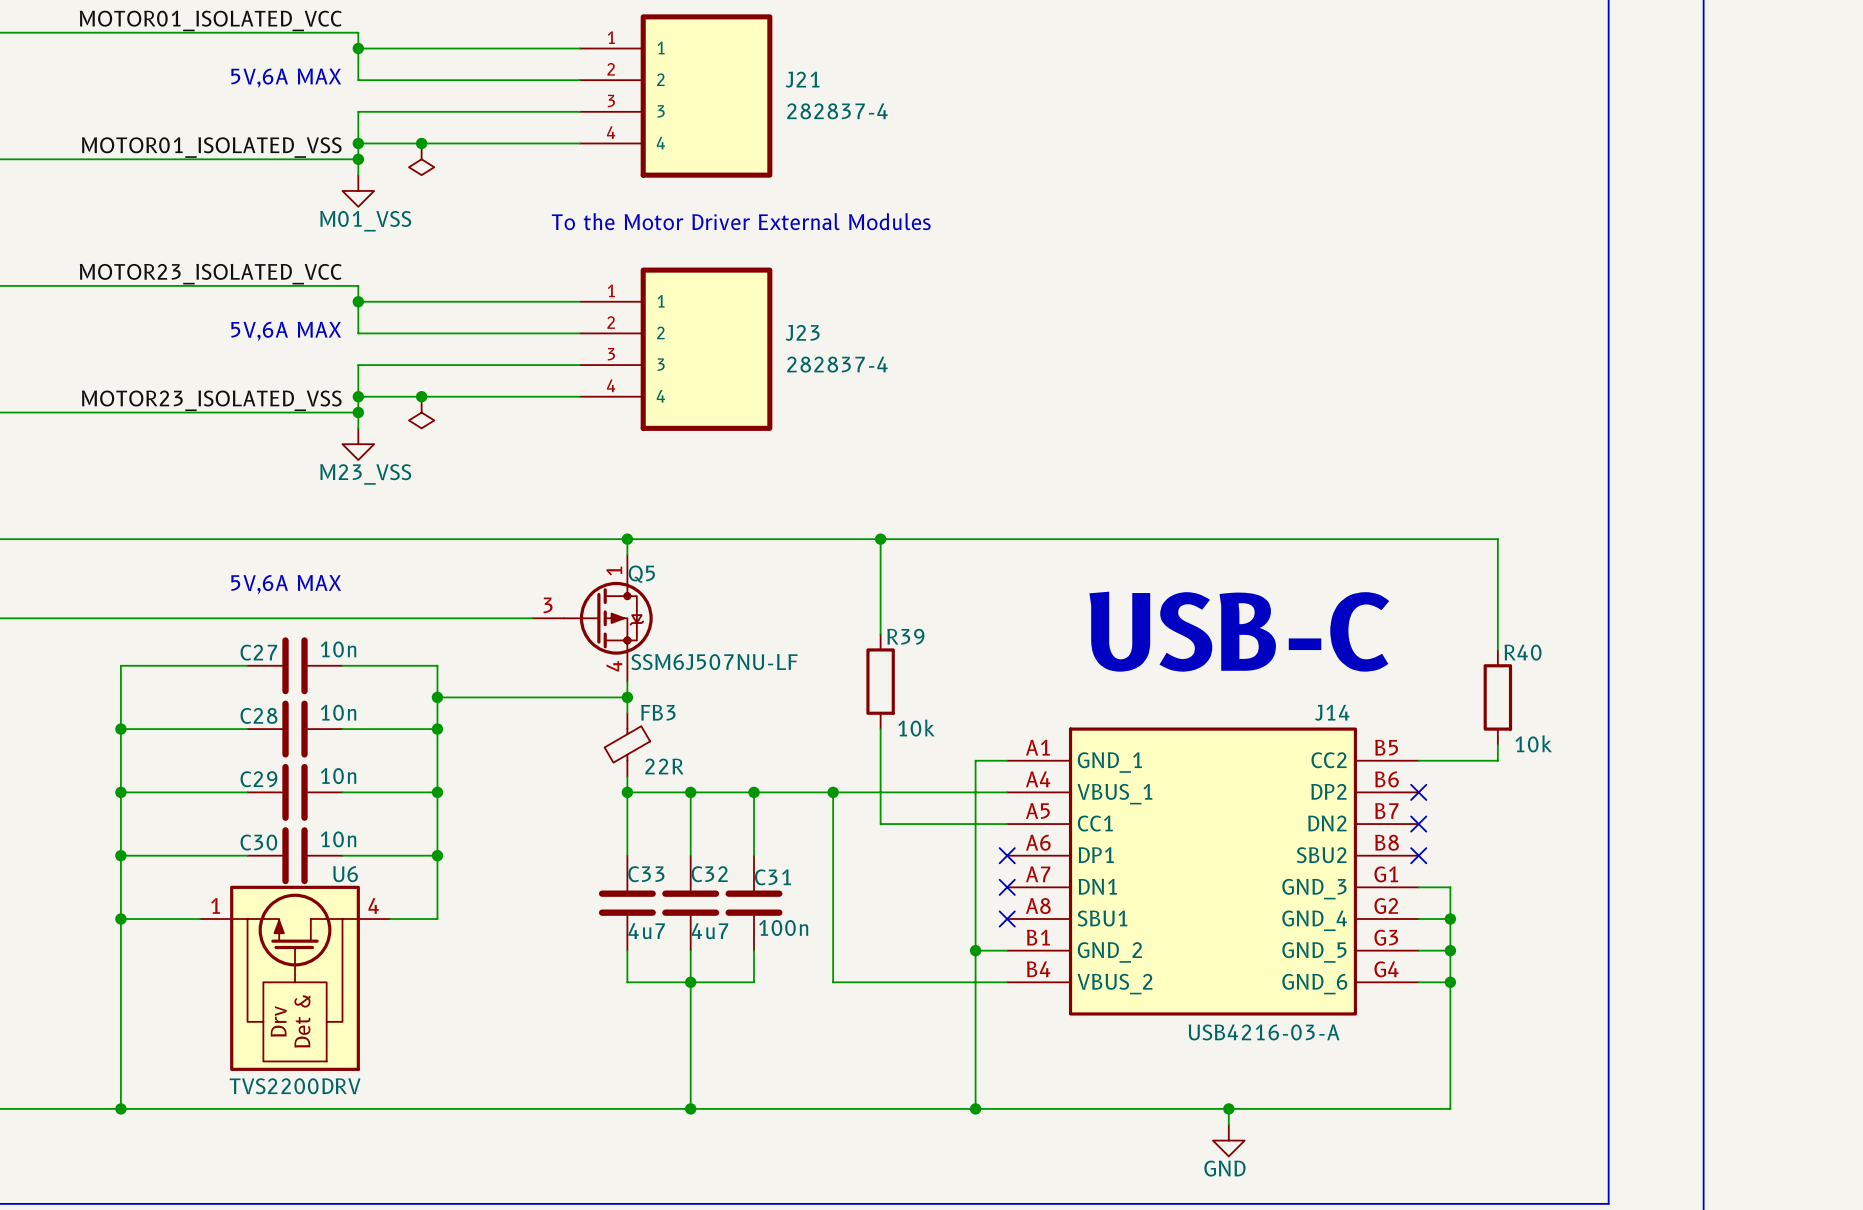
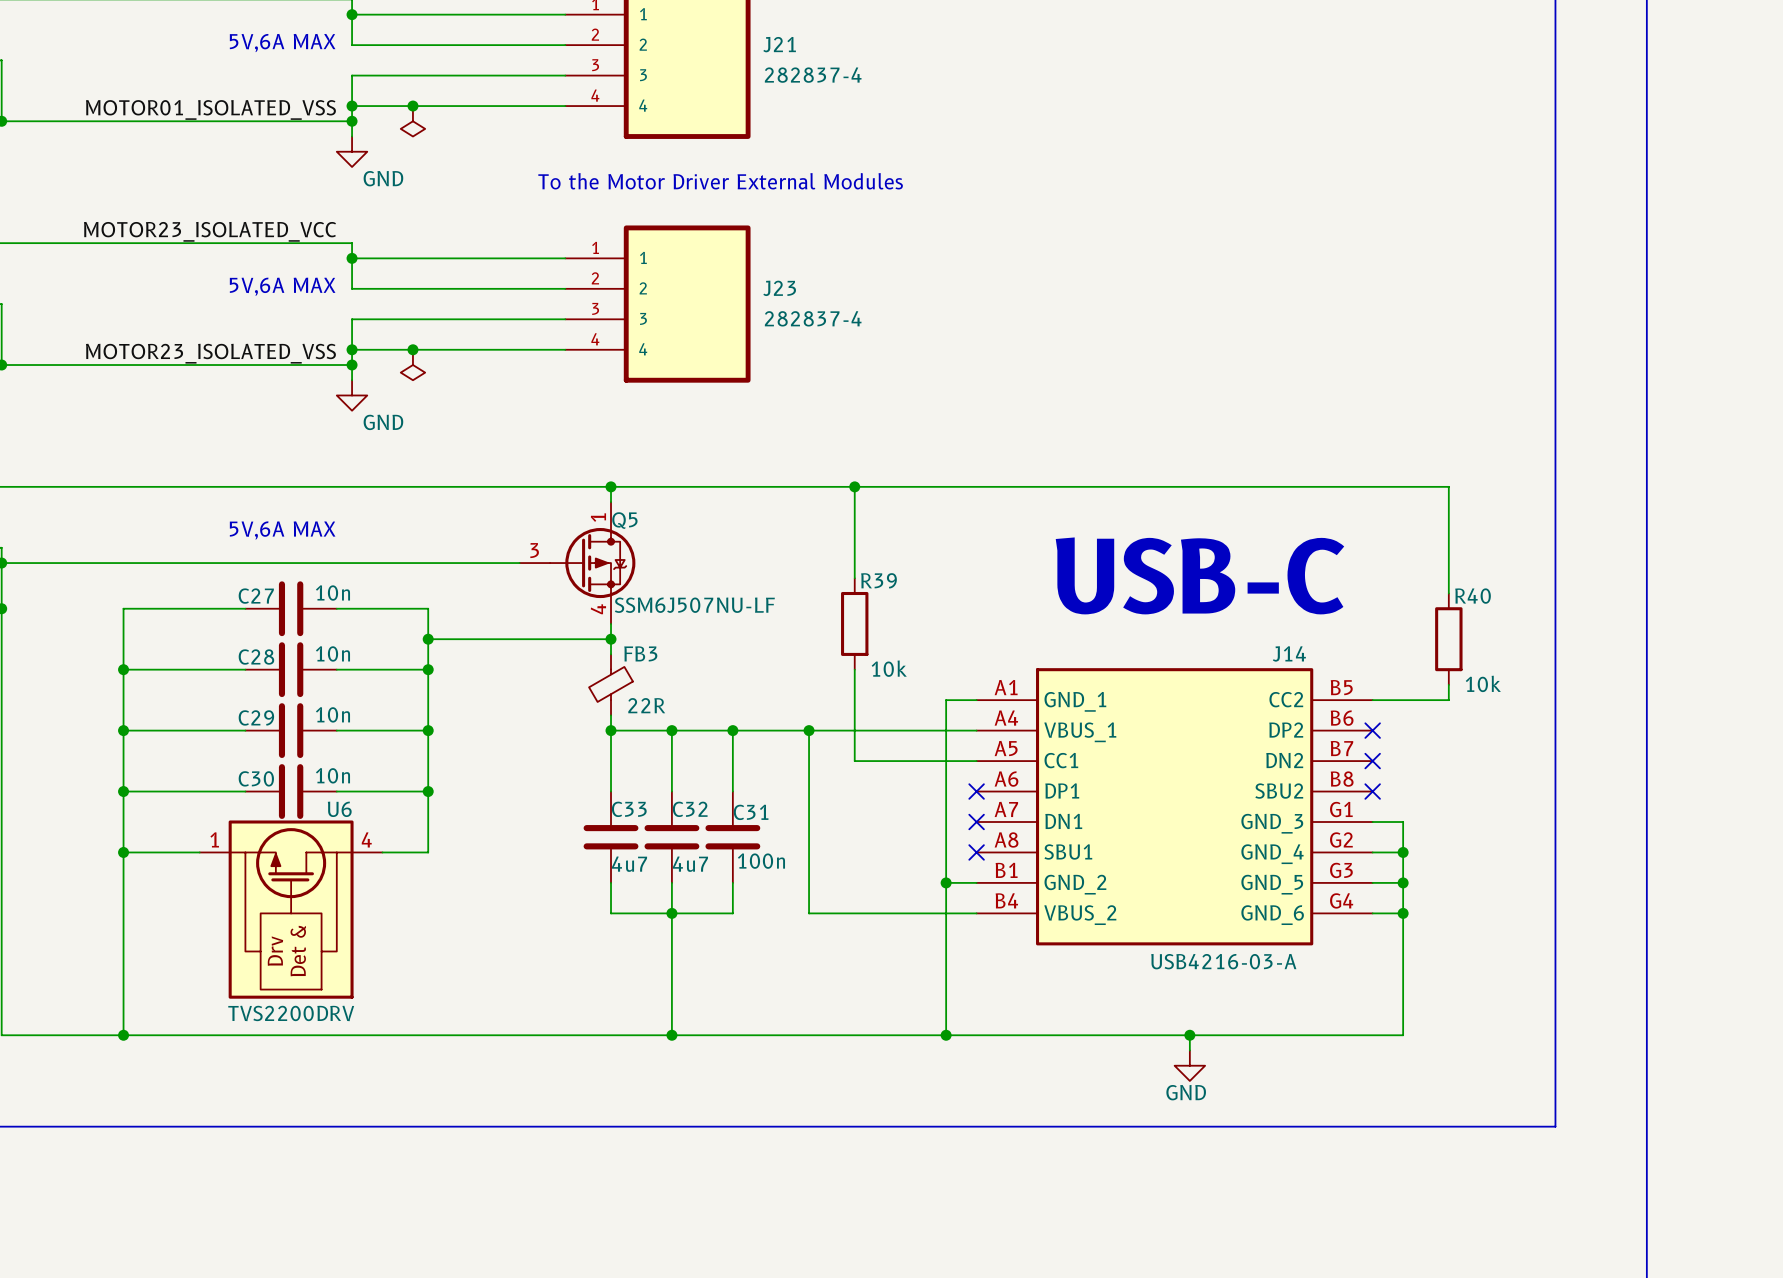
power symbol: M01_VSS (358, 190) -> GND (352, 151)
power symbol: M23_VSS (358, 444) -> GND (352, 395)

